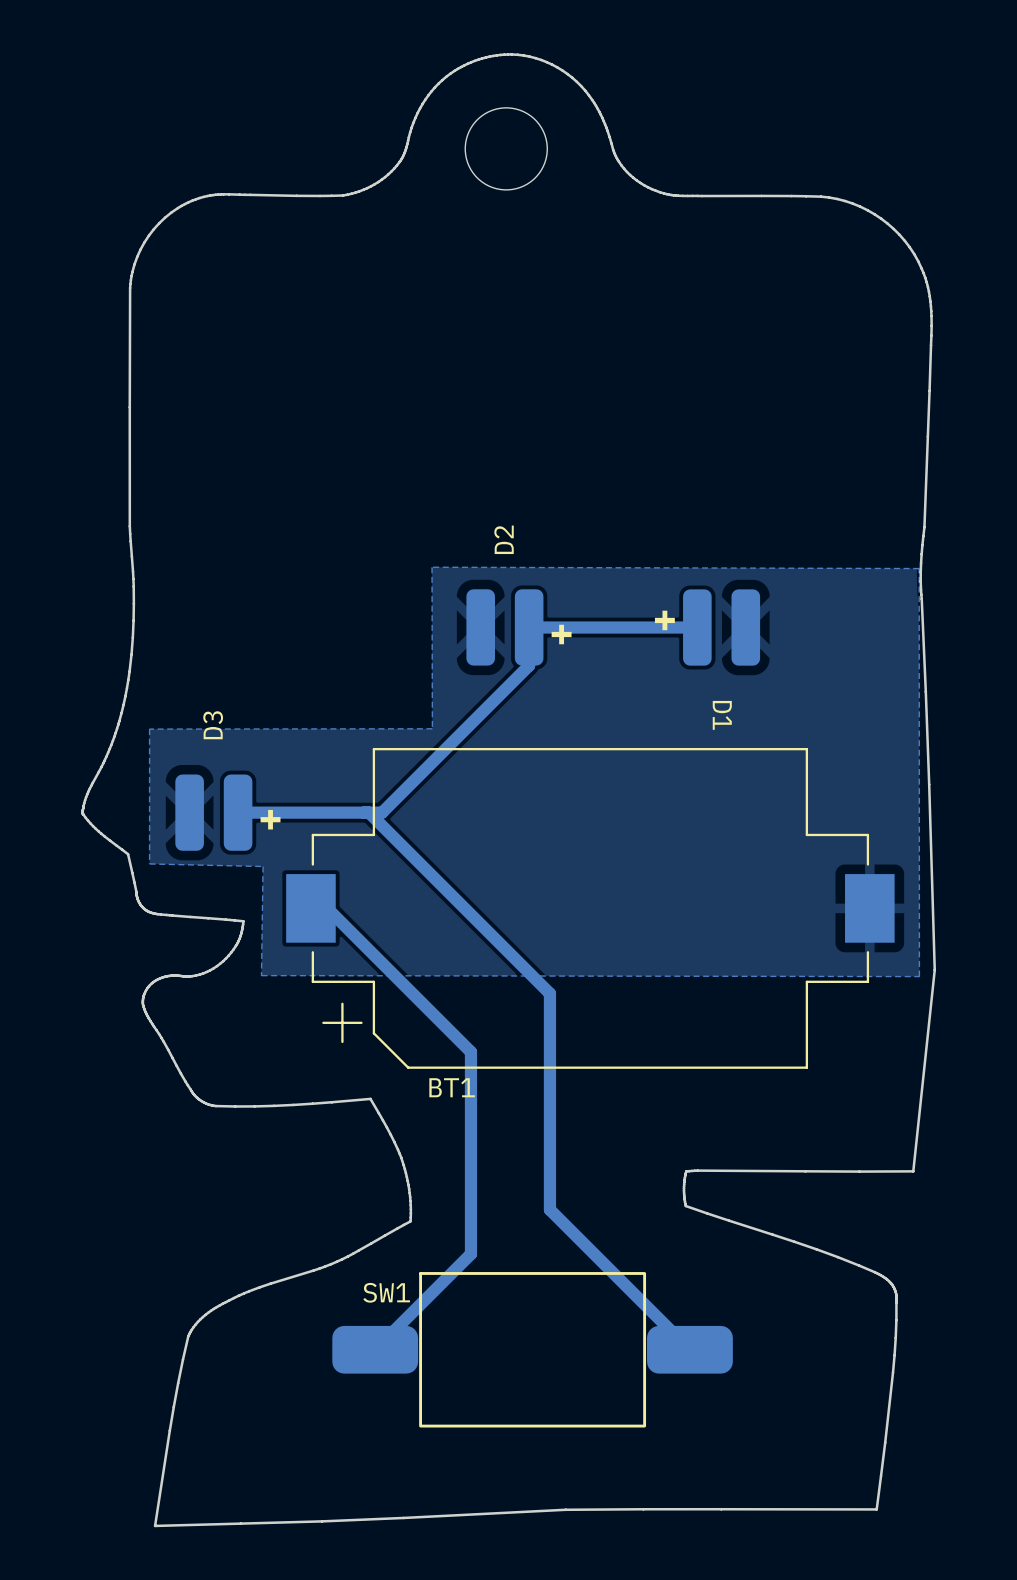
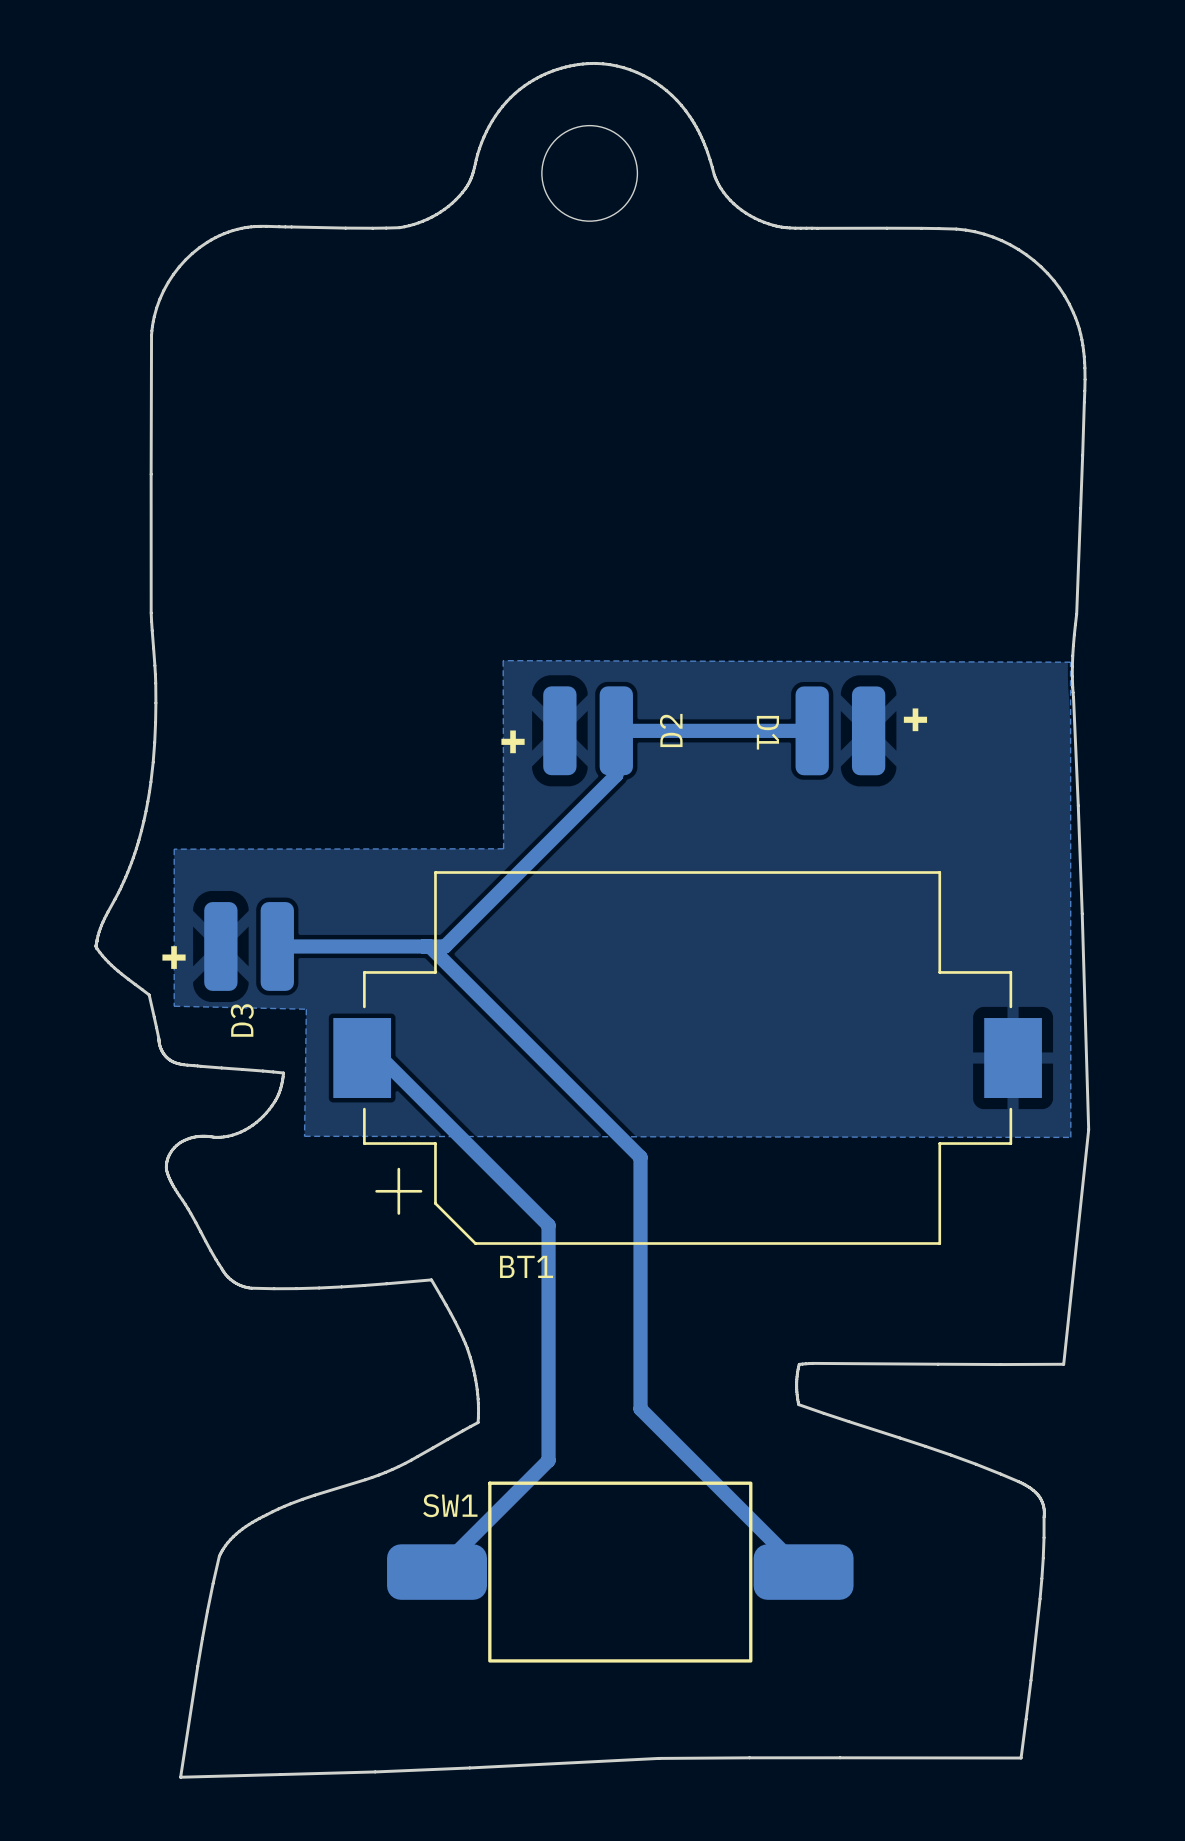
D2 name position: D2 (504, 539) -> D2 (671, 730)
D1 text position: + (664, 620) -> + (915, 719)
D2 text position: + (561, 634) -> + (513, 741)
D1 name position: D1 (722, 715) -> D1 (767, 732)
D3 name position: D3 (213, 725) -> D3 (242, 1020)
D3 text position: + (270, 819) -> + (174, 957)

